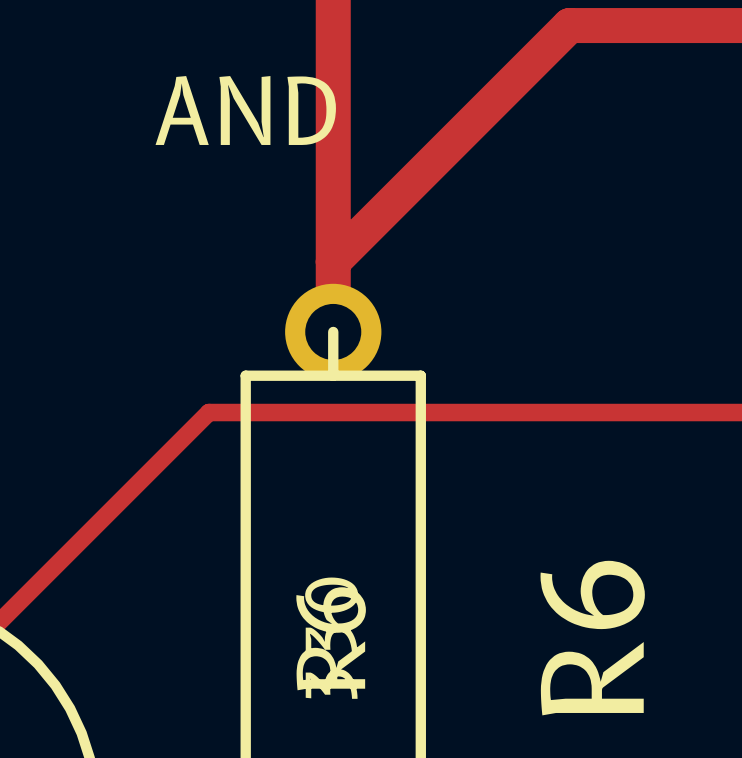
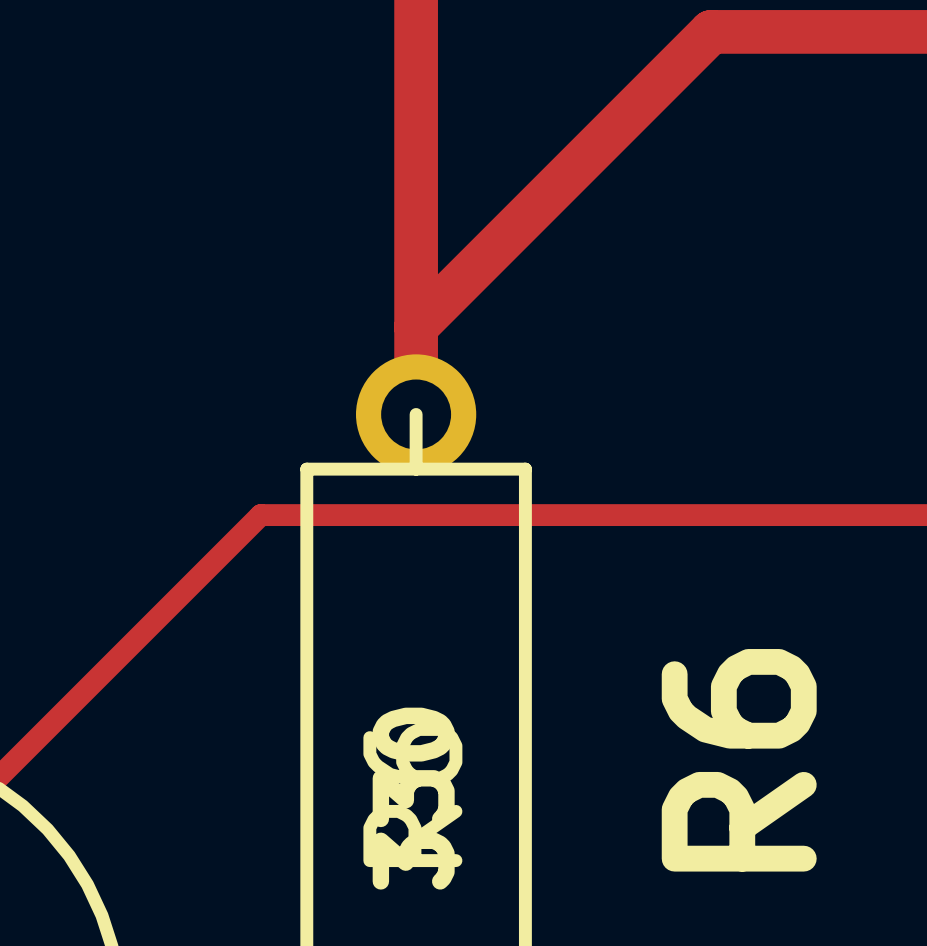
text: AND (245, 110) -> none

